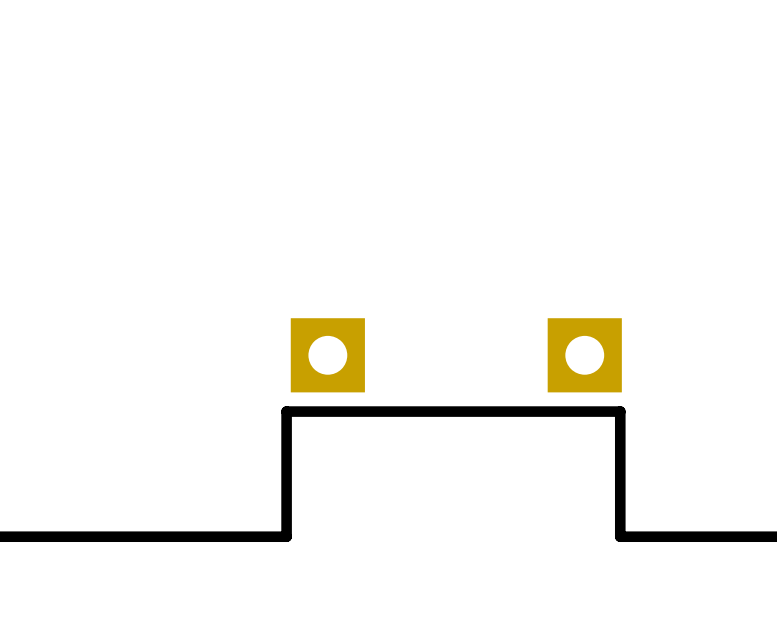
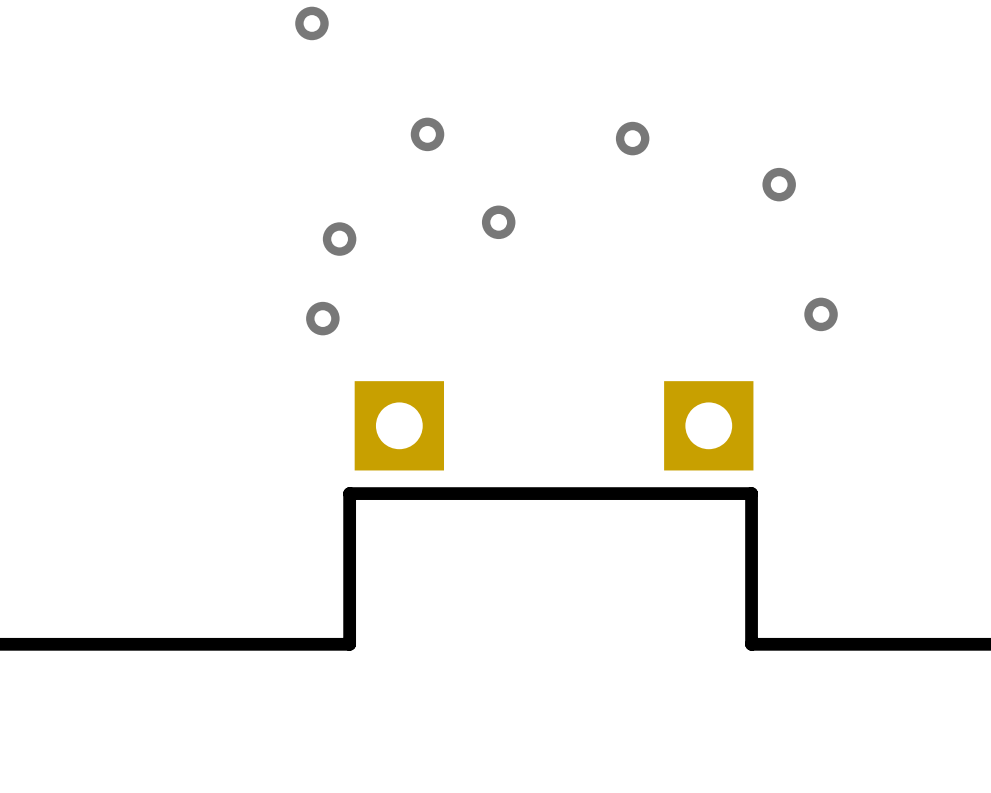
via: none -> (311, 23)
via: none -> (427, 134)
via: none -> (632, 138)
via: none -> (779, 184)
via: none -> (498, 222)
via: none -> (339, 239)
via: none -> (821, 314)
via: none -> (322, 318)

